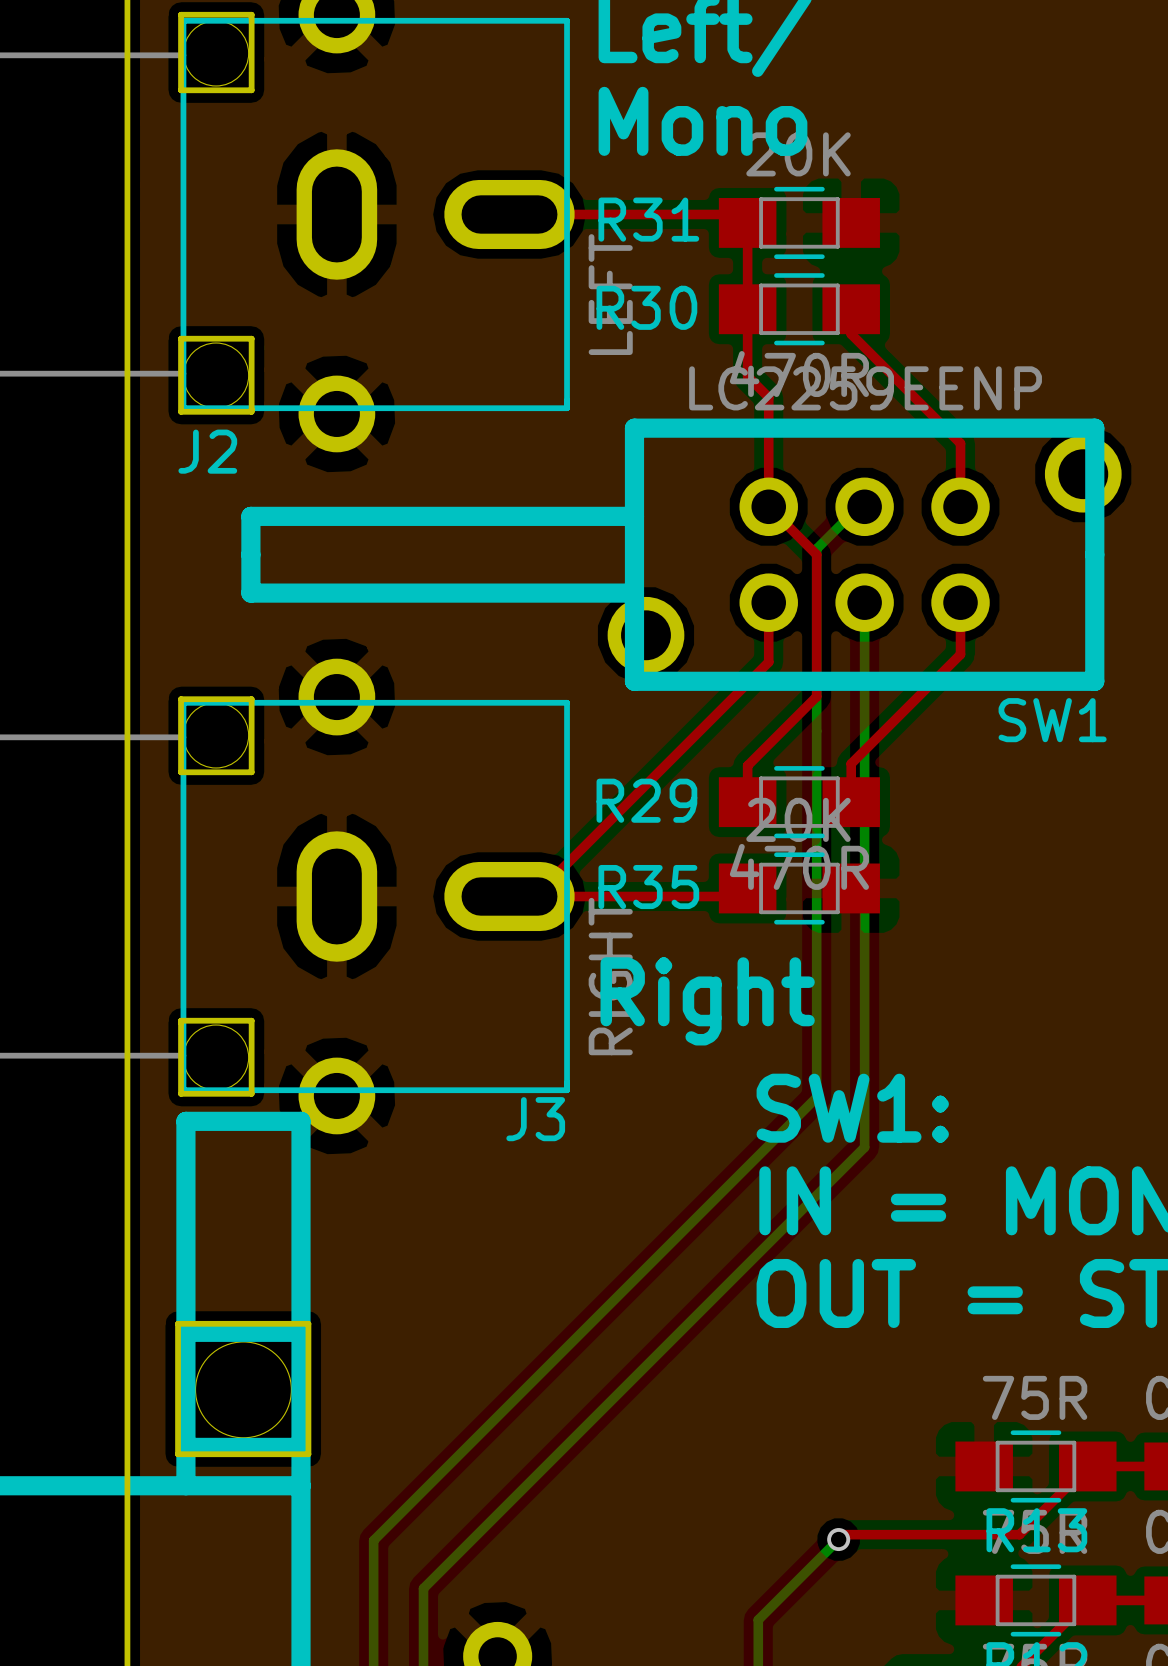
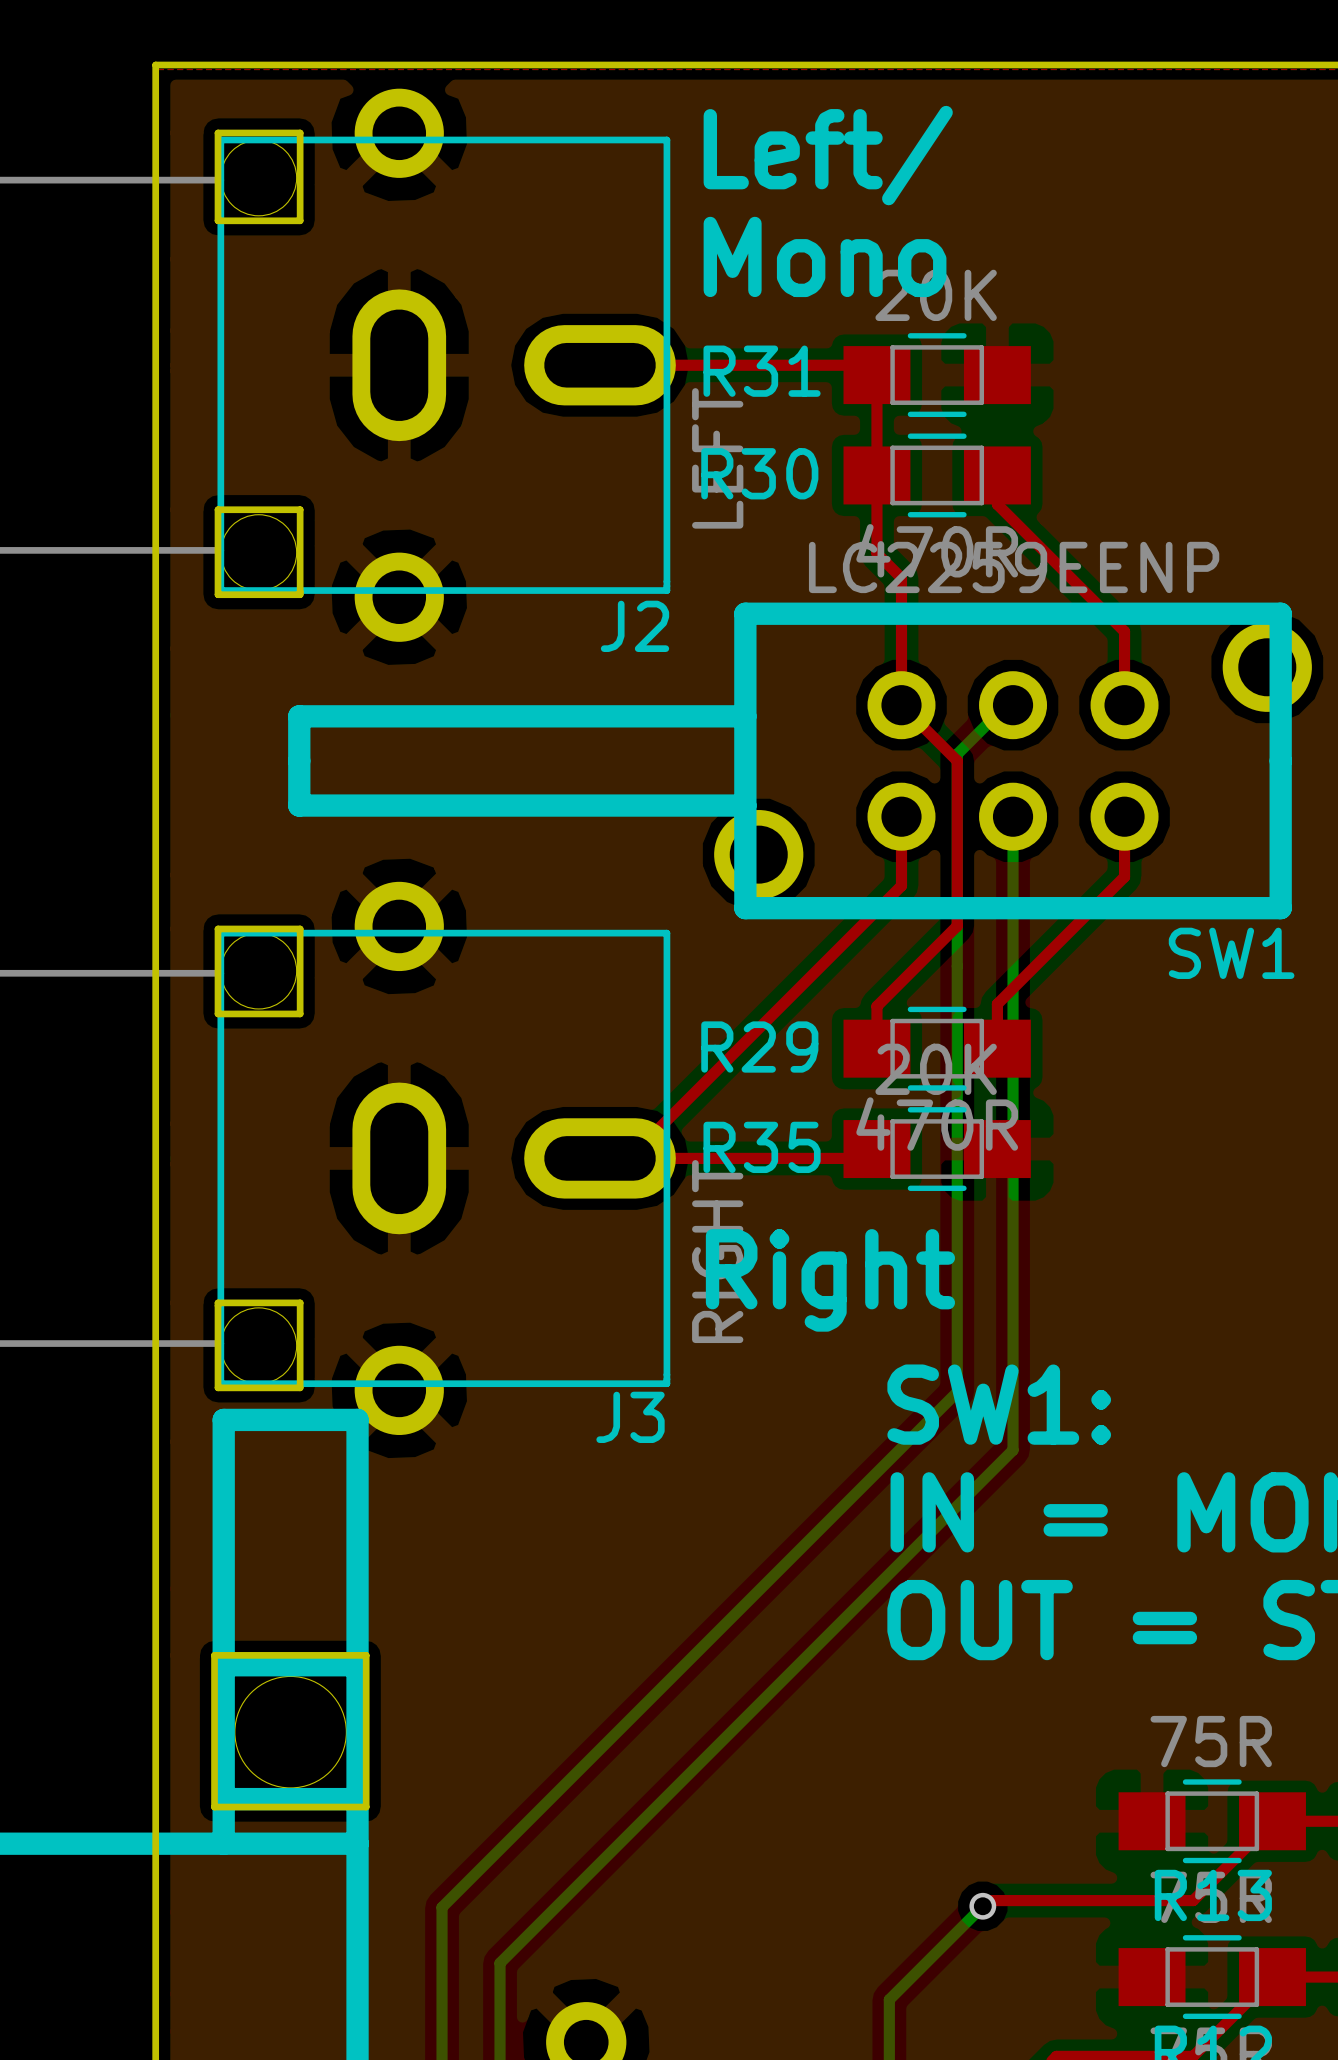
J2 name position: J2 (207, 451) -> J2 (635, 626)

